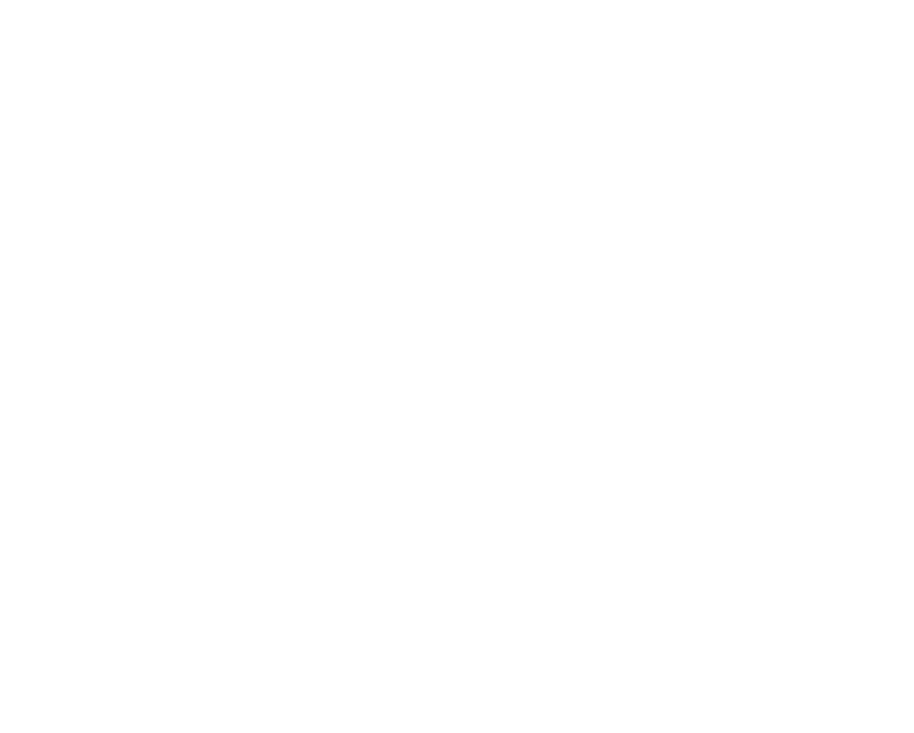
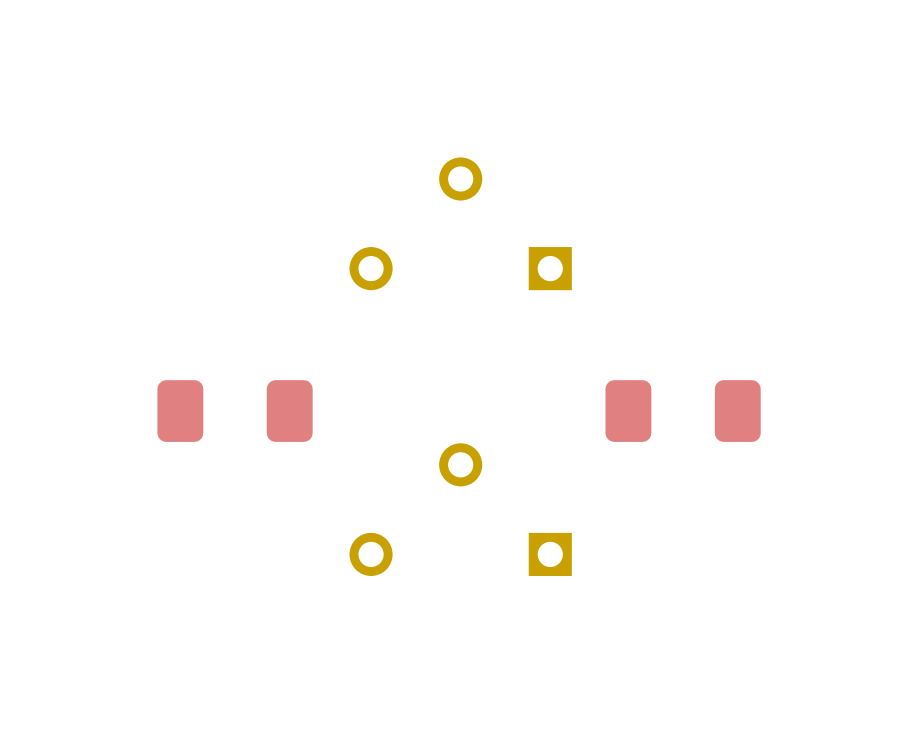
part: none -> (460, 223)
part: none -> (235, 411)
part: none -> (683, 411)
part: none -> (460, 509)

